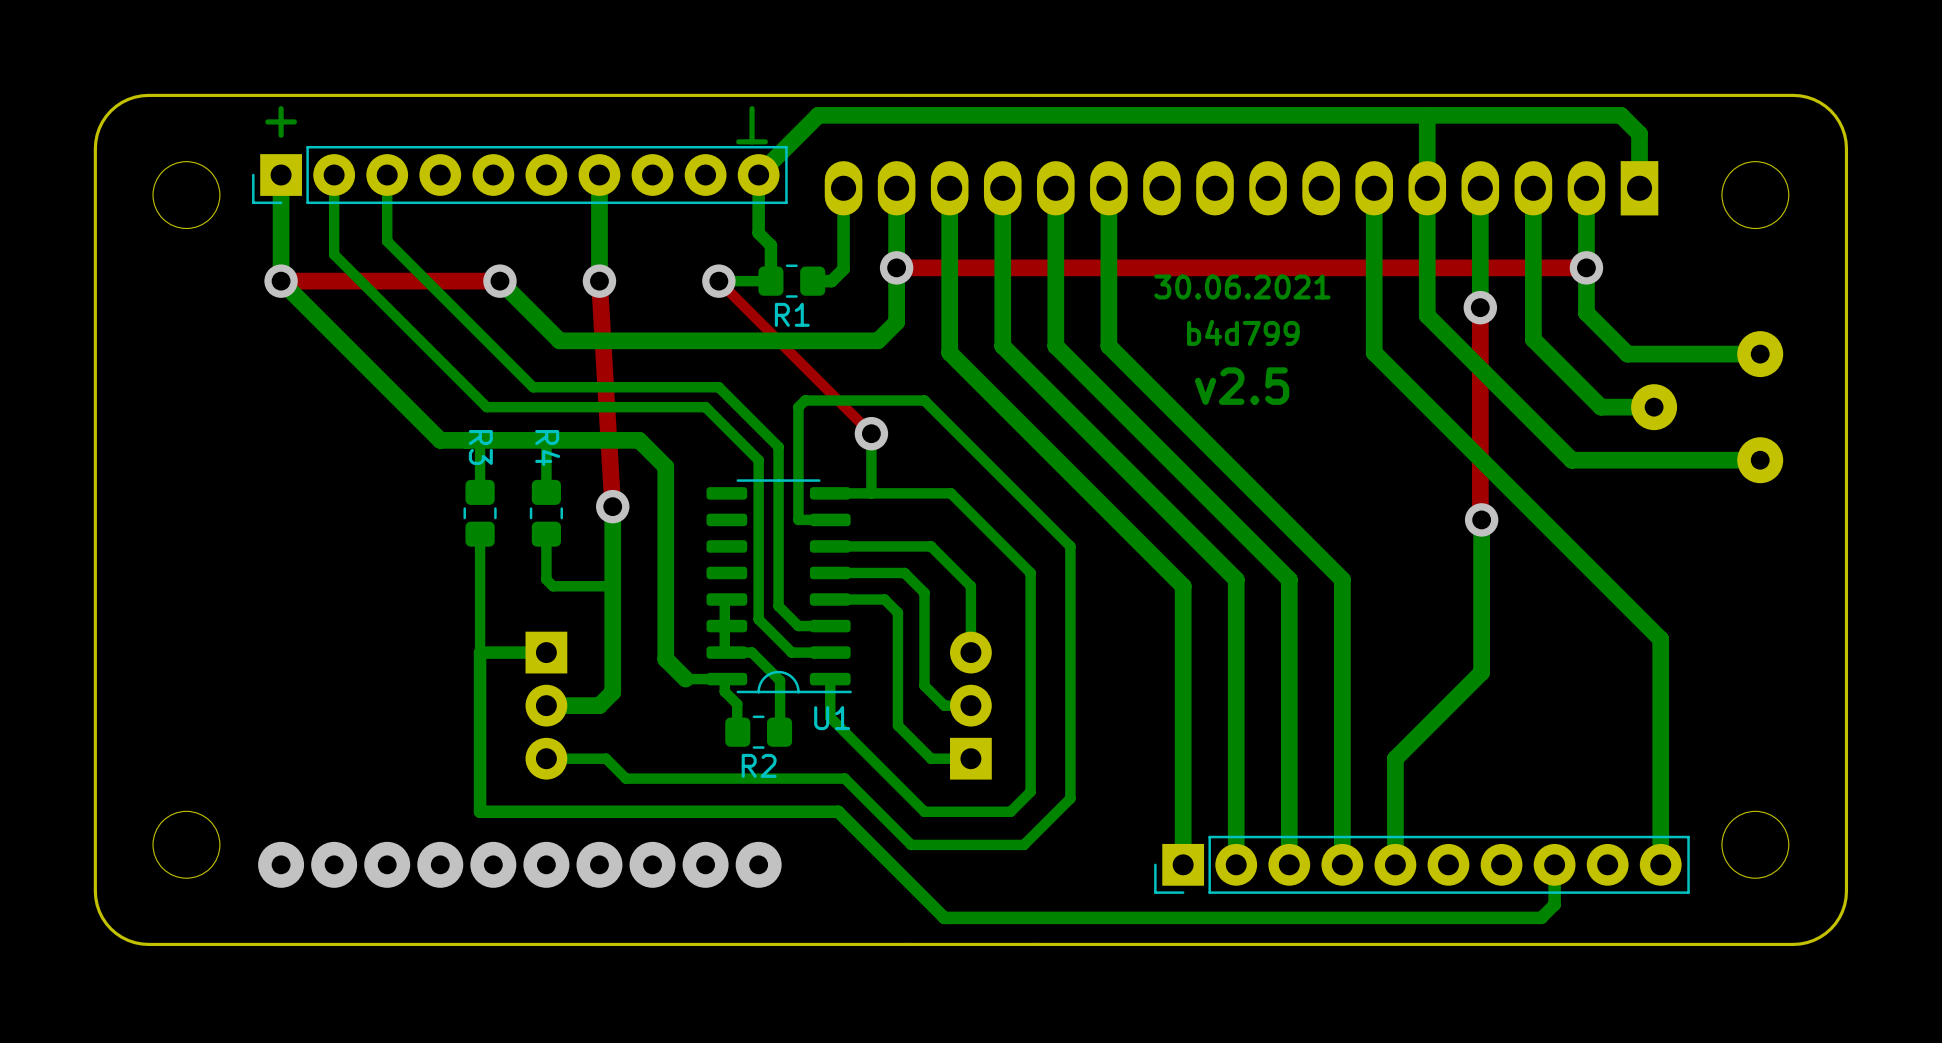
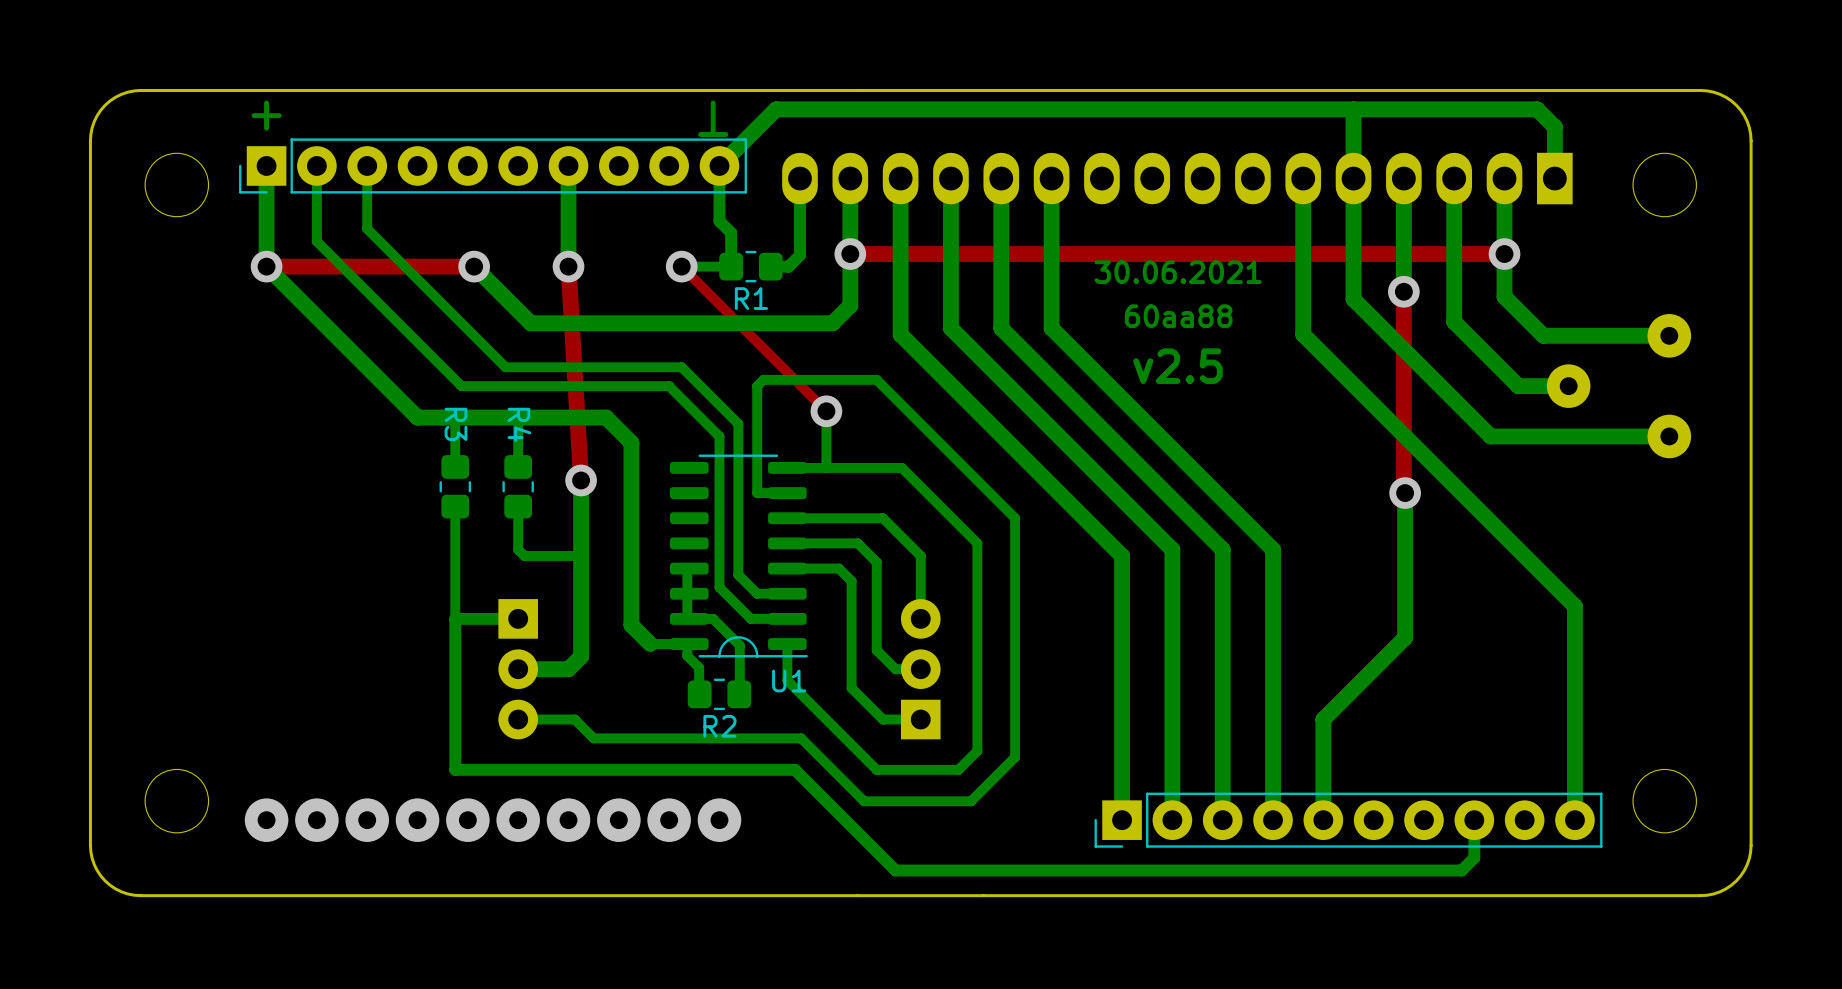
text: b4d799 (1243, 332) -> 60aa88 (1178, 316)

